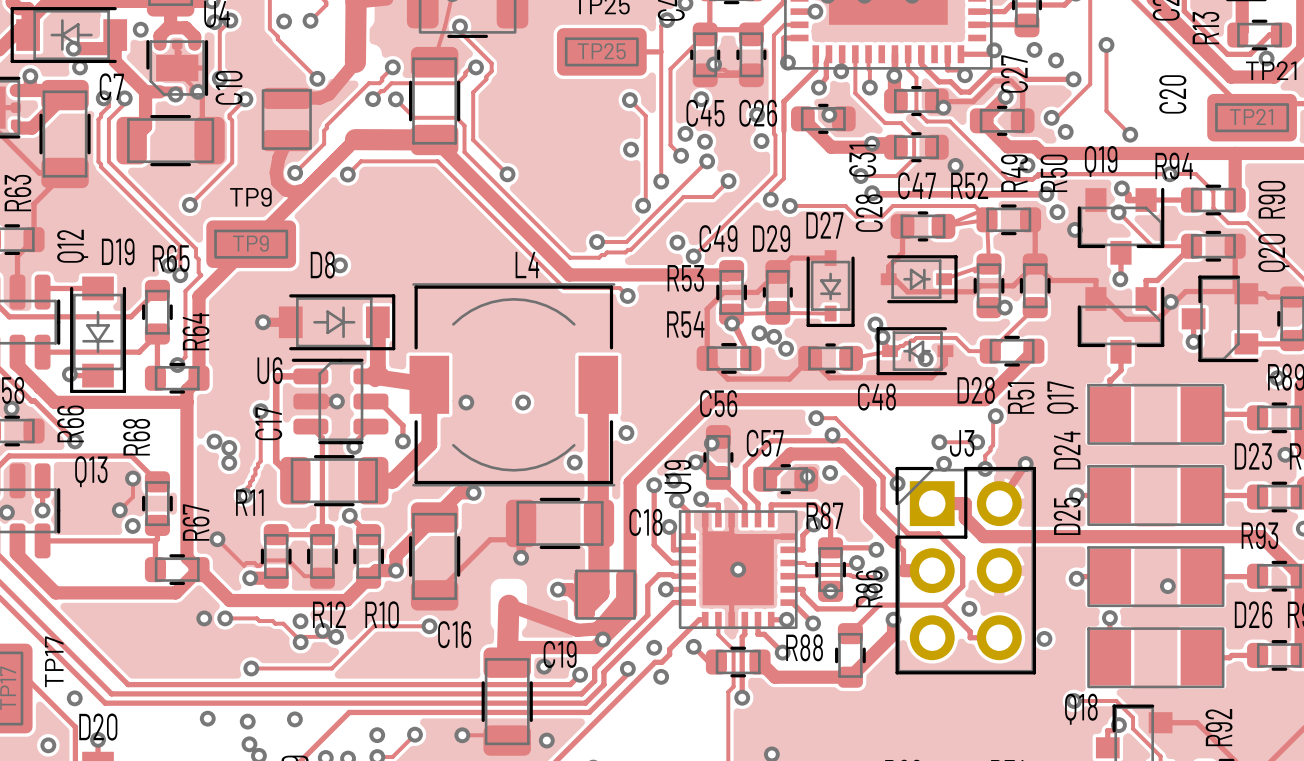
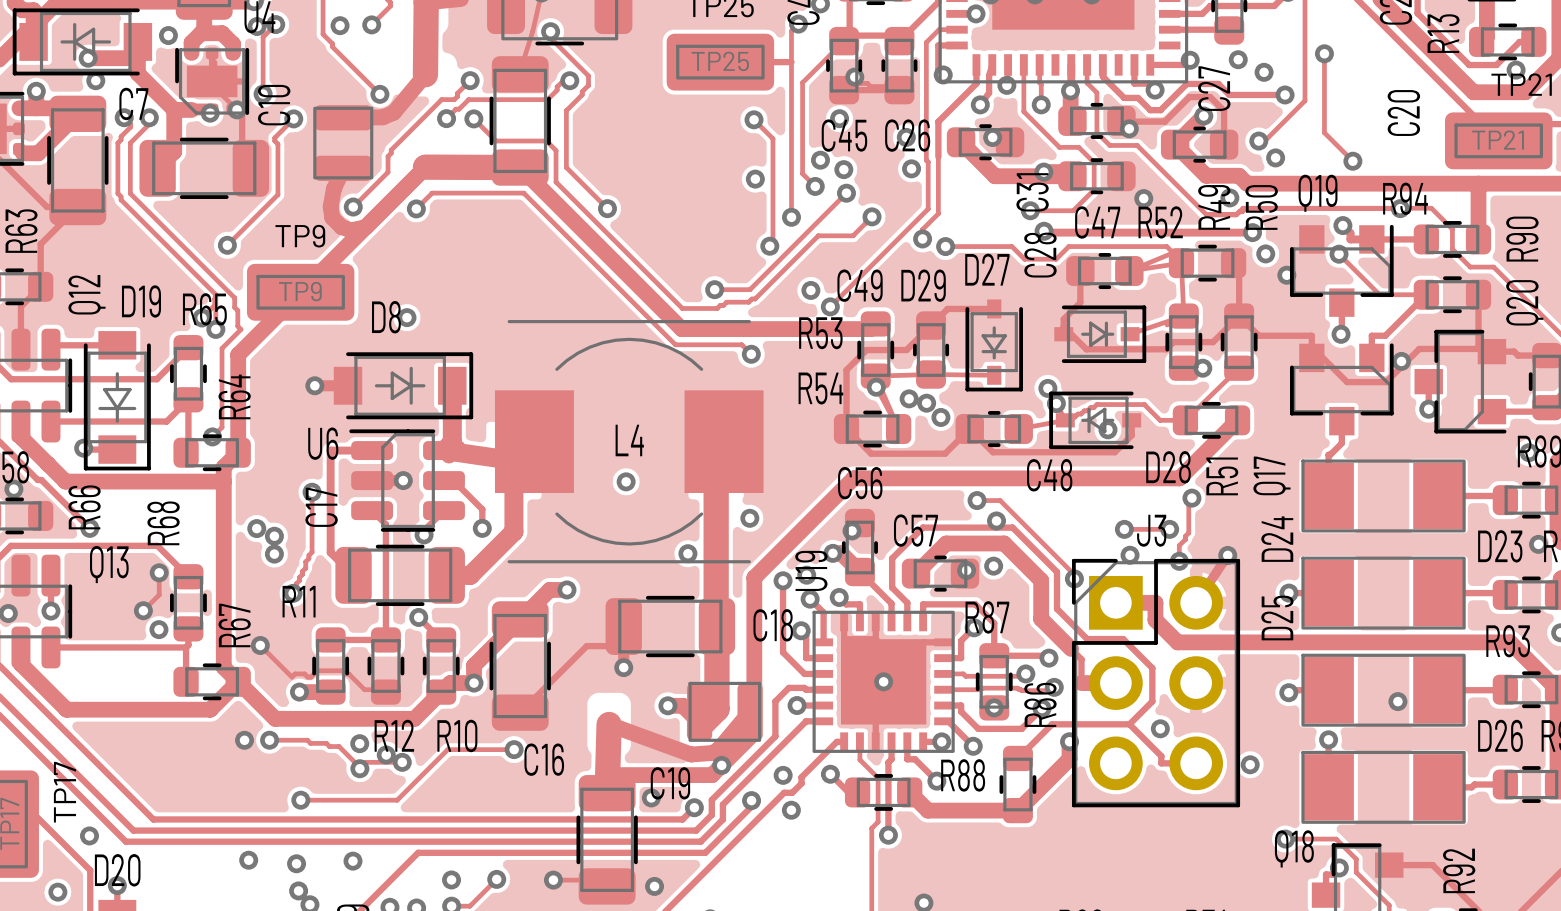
L4 name position: L4 (527, 265) -> L4 (629, 440)
L4 footprint: [409, 283, 619, 487] -> [494, 320, 764, 564]
via: (466, 402) -> none

